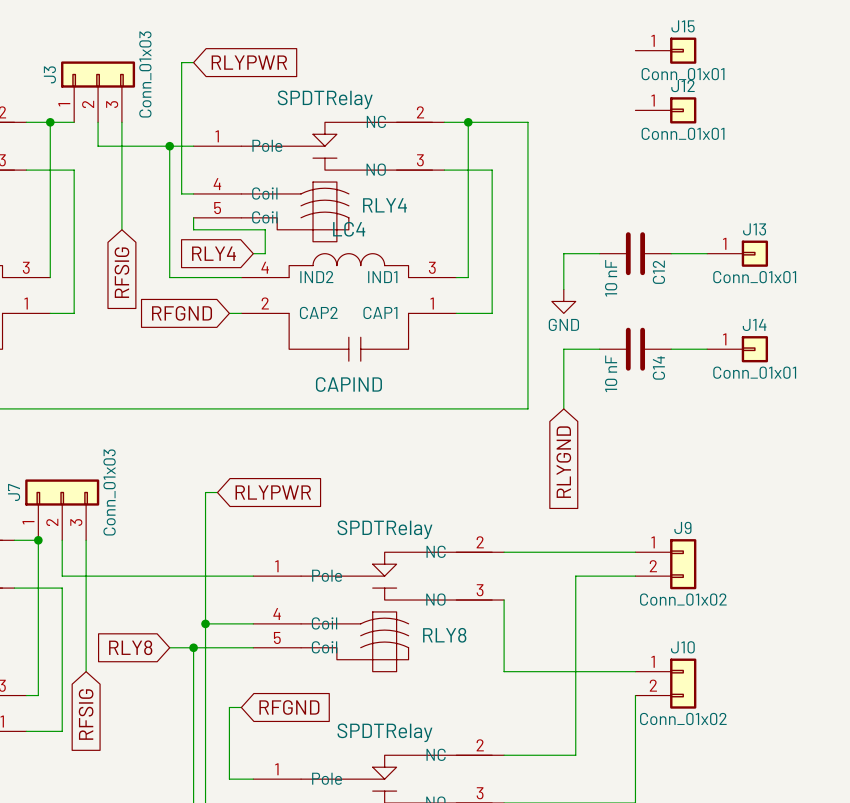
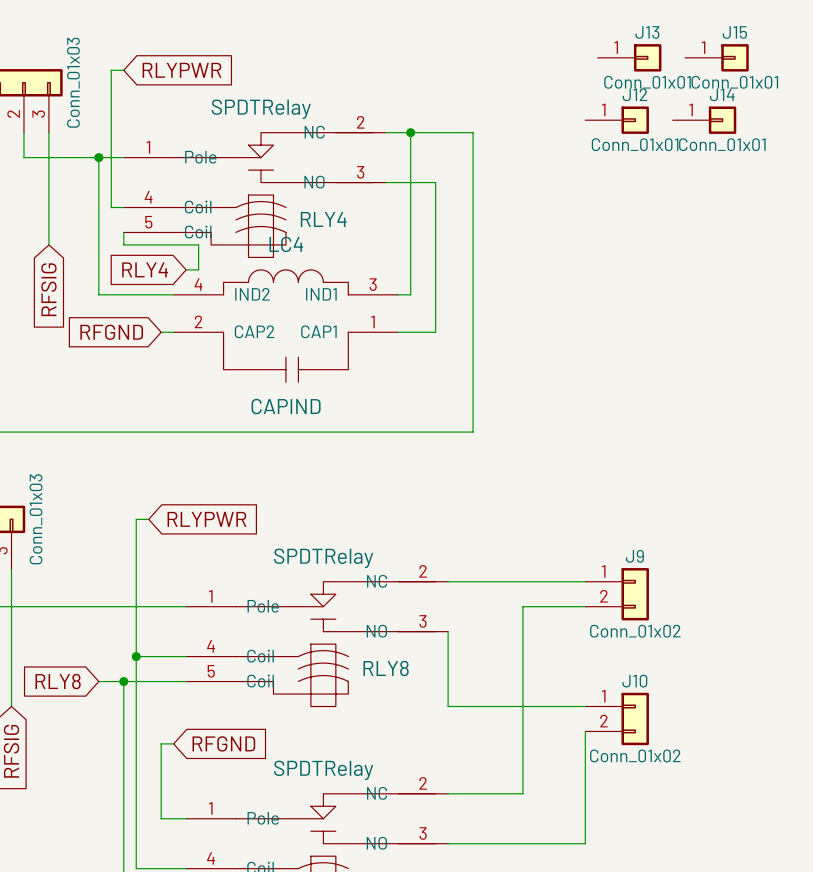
J15 position: (665, 50) -> (716, 57)
wire: (599, 253) (563, 253) (563, 289) -> none
C12: 10 nF (635, 253) -> none
wire: (671, 253) (707, 253) -> none
J13 position: (737, 253) -> (629, 57)
power symbol: GND (563, 301) -> none
wire: (599, 349) (563, 349) (563, 408) -> none
C14: 10 nF (635, 349) -> none
wire: (671, 349) (707, 349) -> none
J14 position: (737, 349) -> (704, 120)
global label: RLYGND (563, 462) -> none

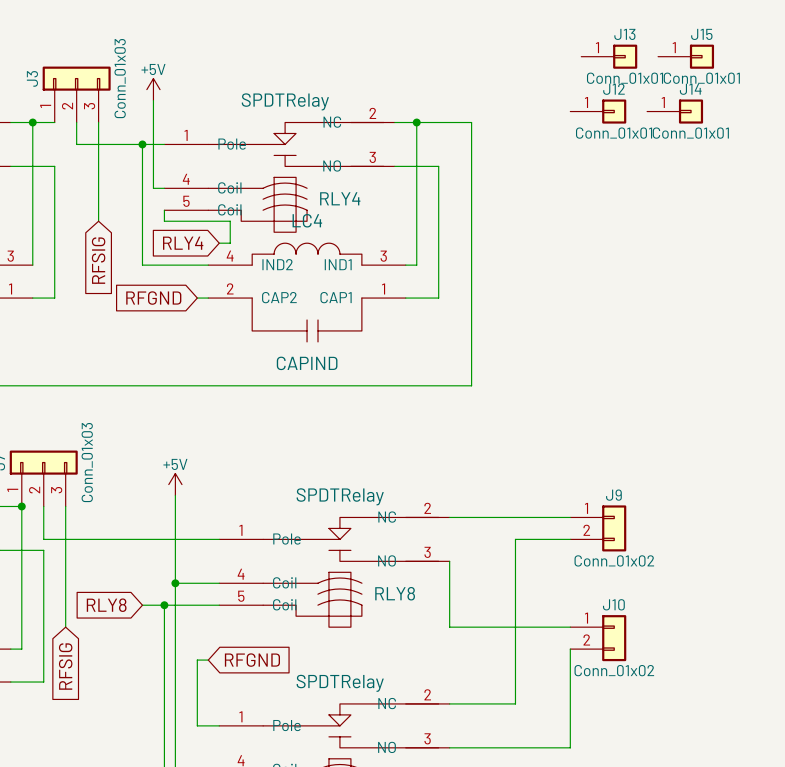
global label: RLYPWR (182, 70) -> none
power symbol: none -> +5V (153, 89)
global label: RLYPWR (206, 519) -> none
power symbol: none -> +5V (175, 484)

